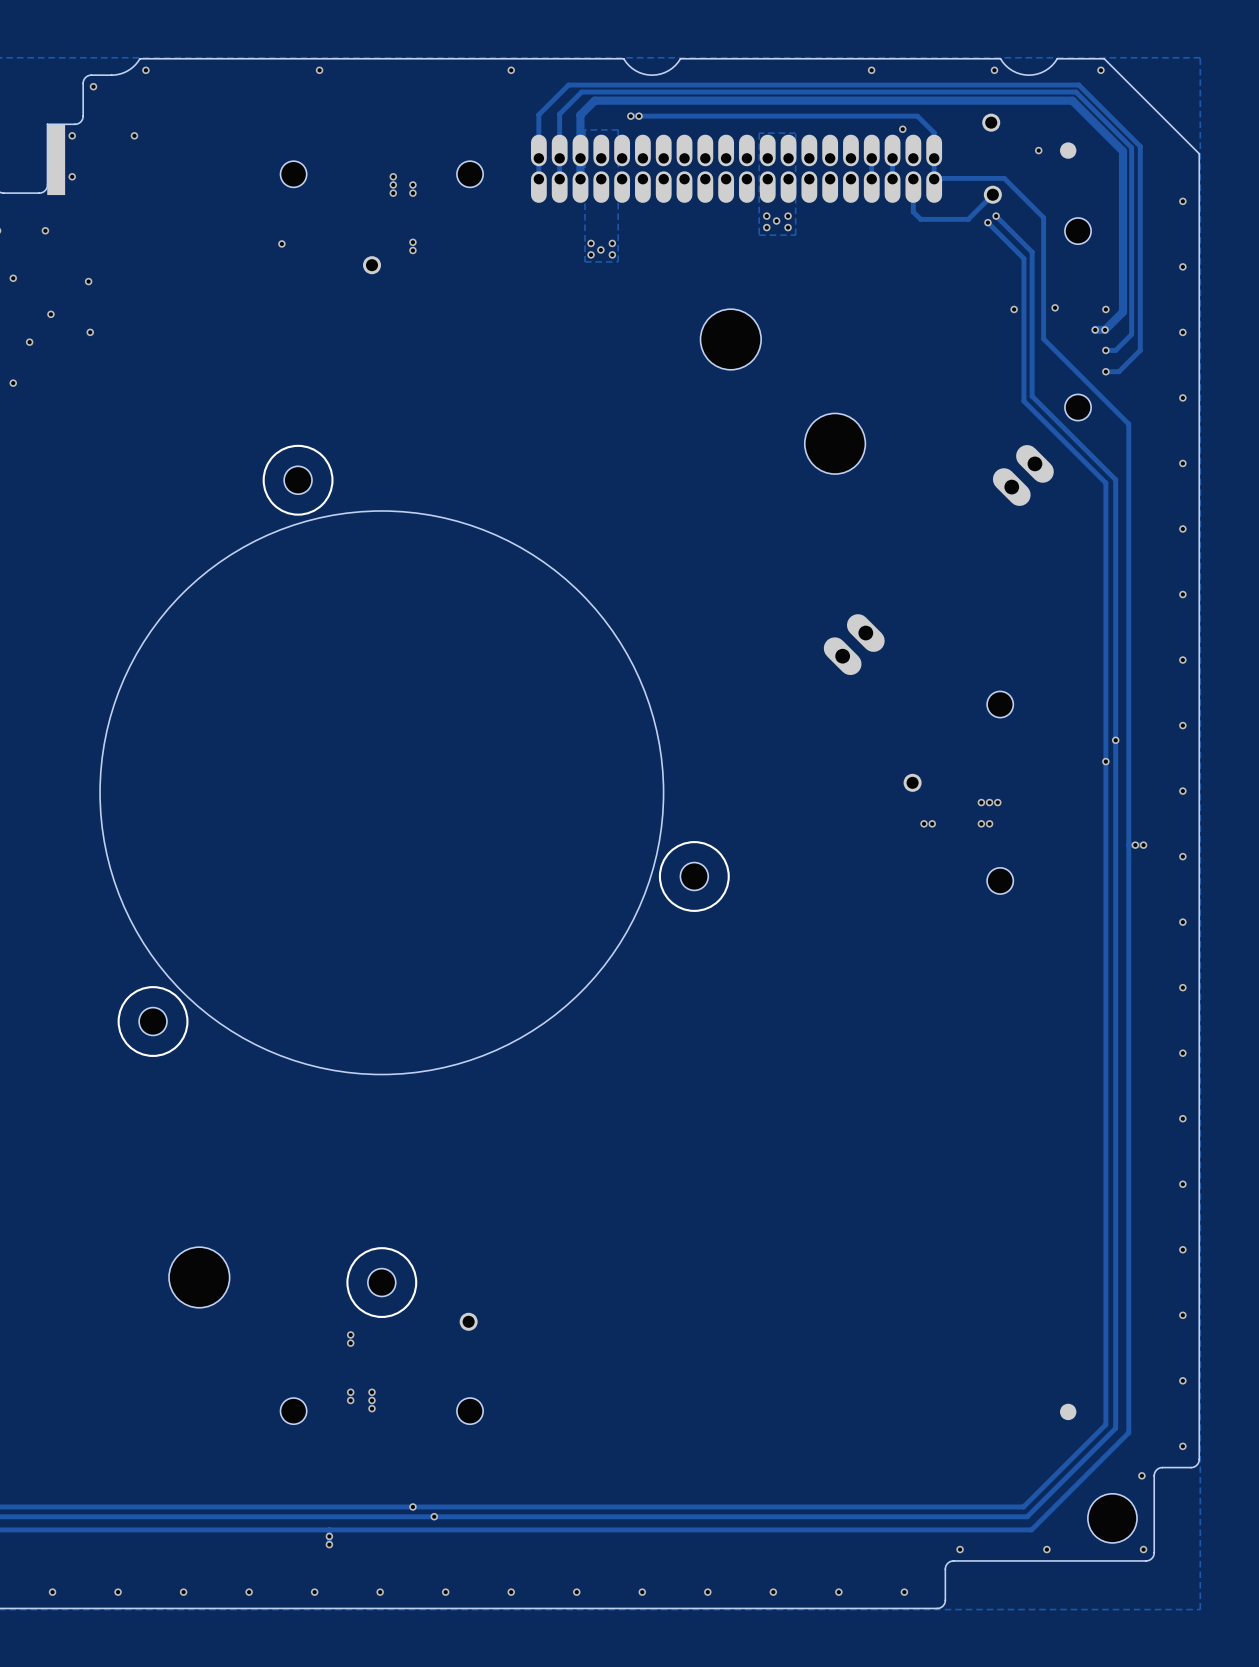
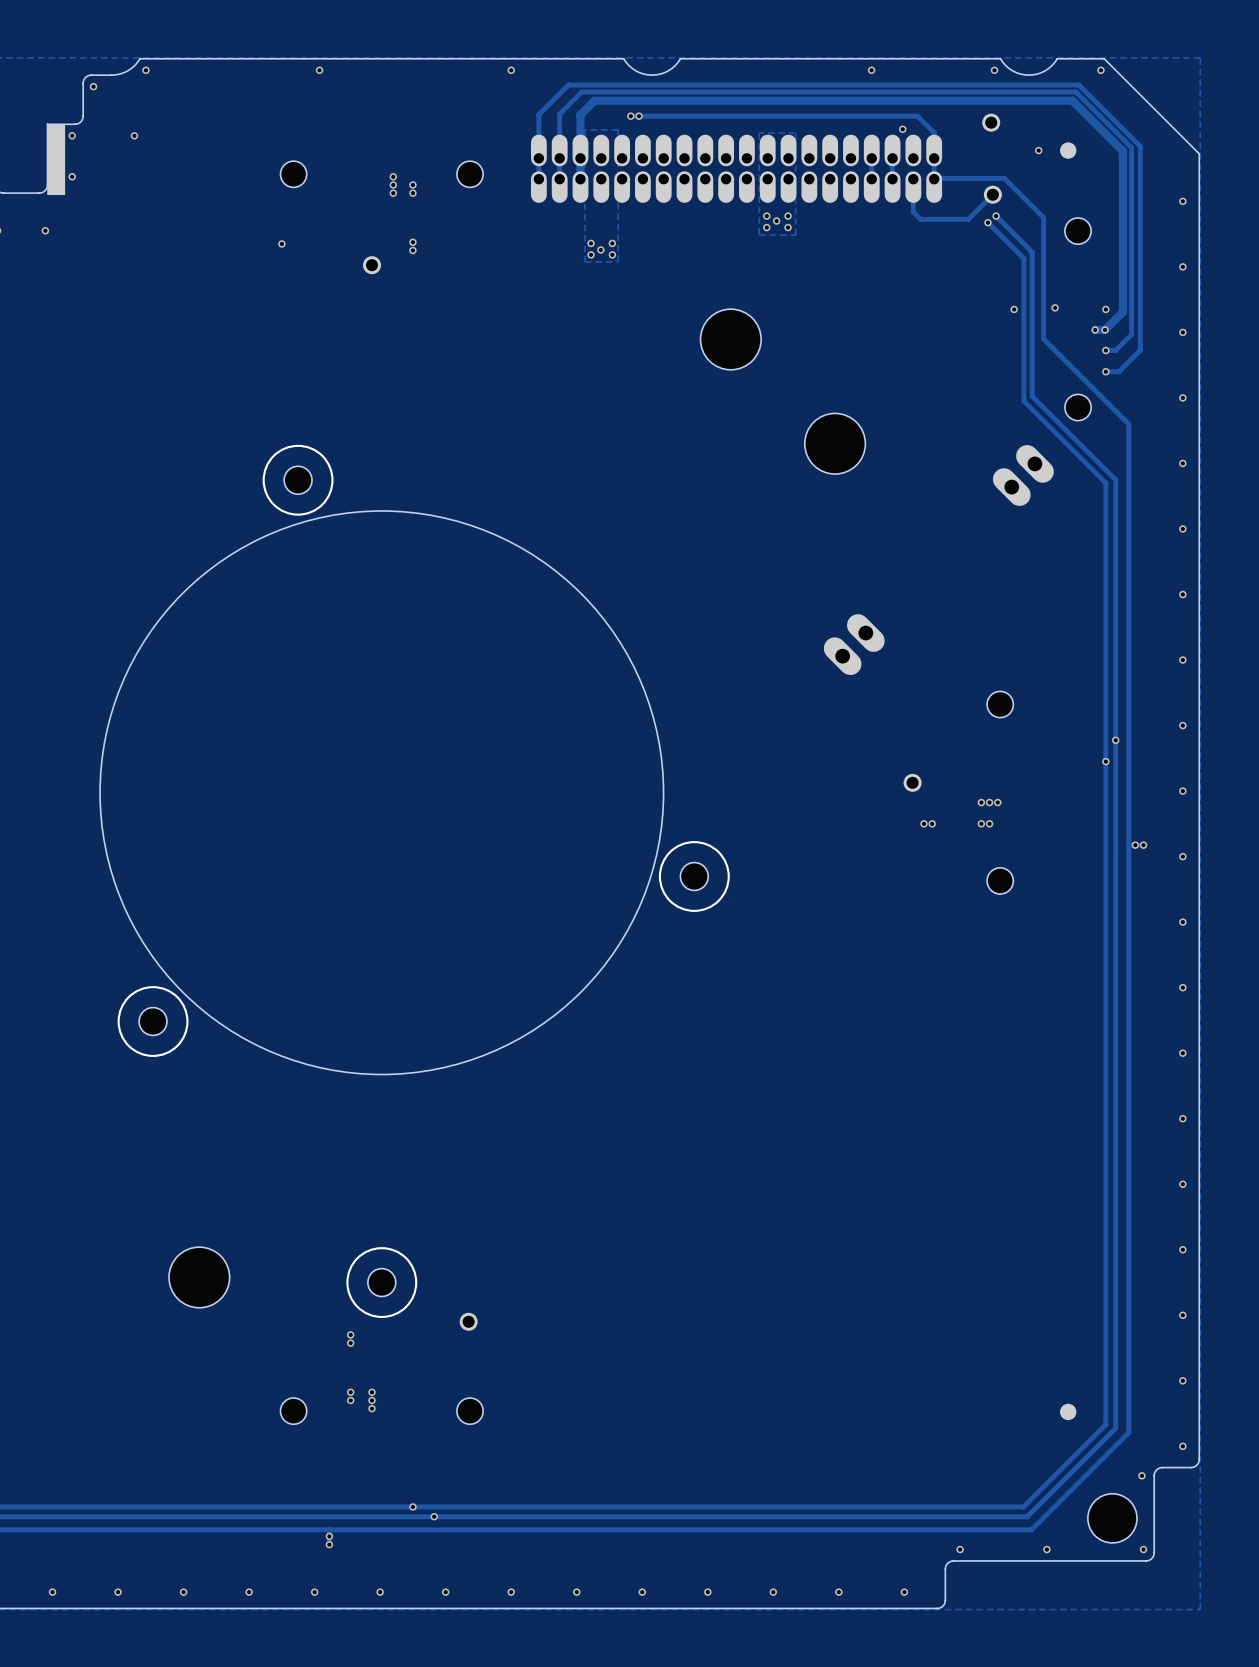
via: (13, 278) -> none
via: (88, 281) -> none
via: (50, 314) -> none
via: (90, 332) -> none
via: (29, 342) -> none
via: (13, 383) -> none

